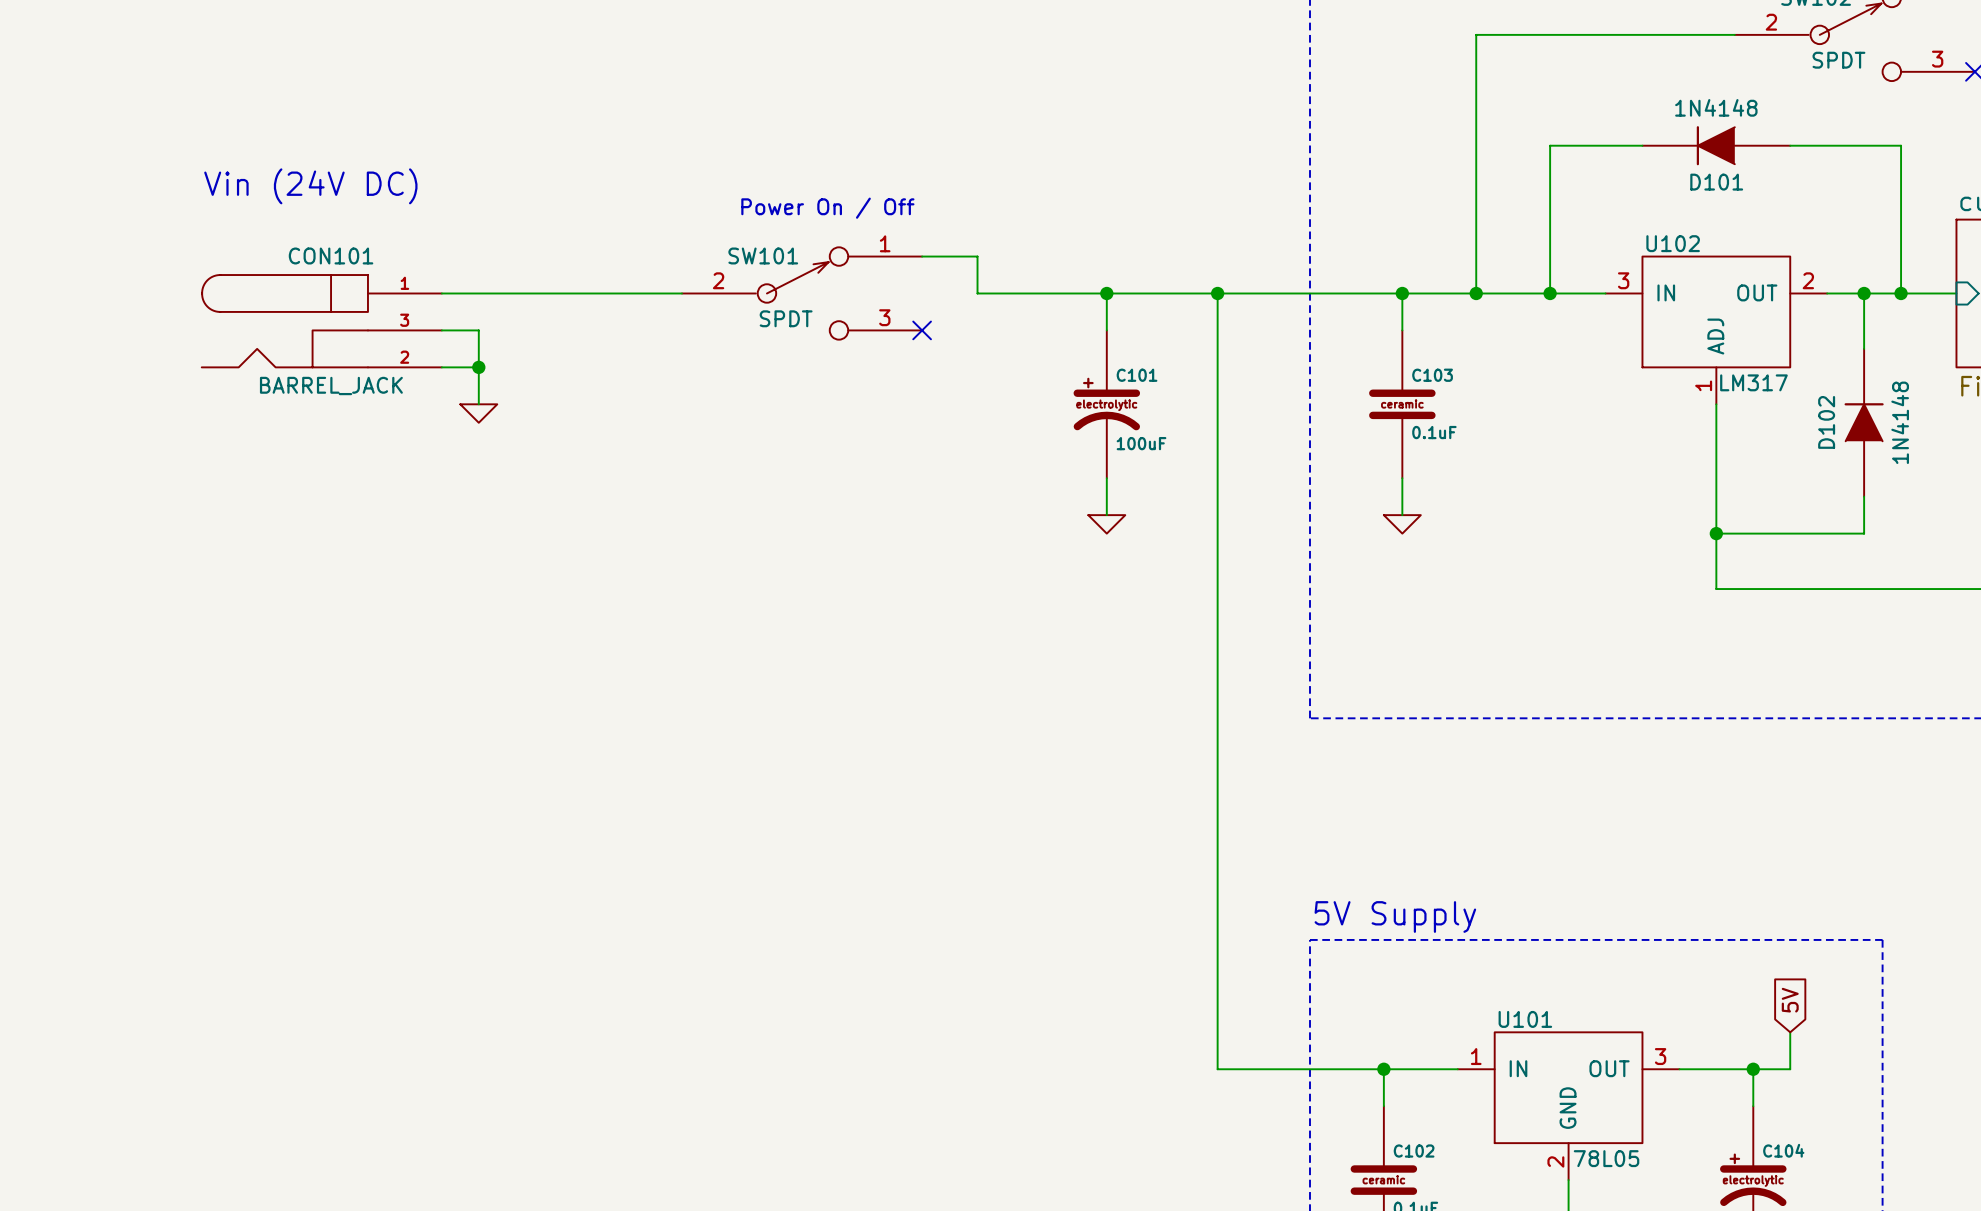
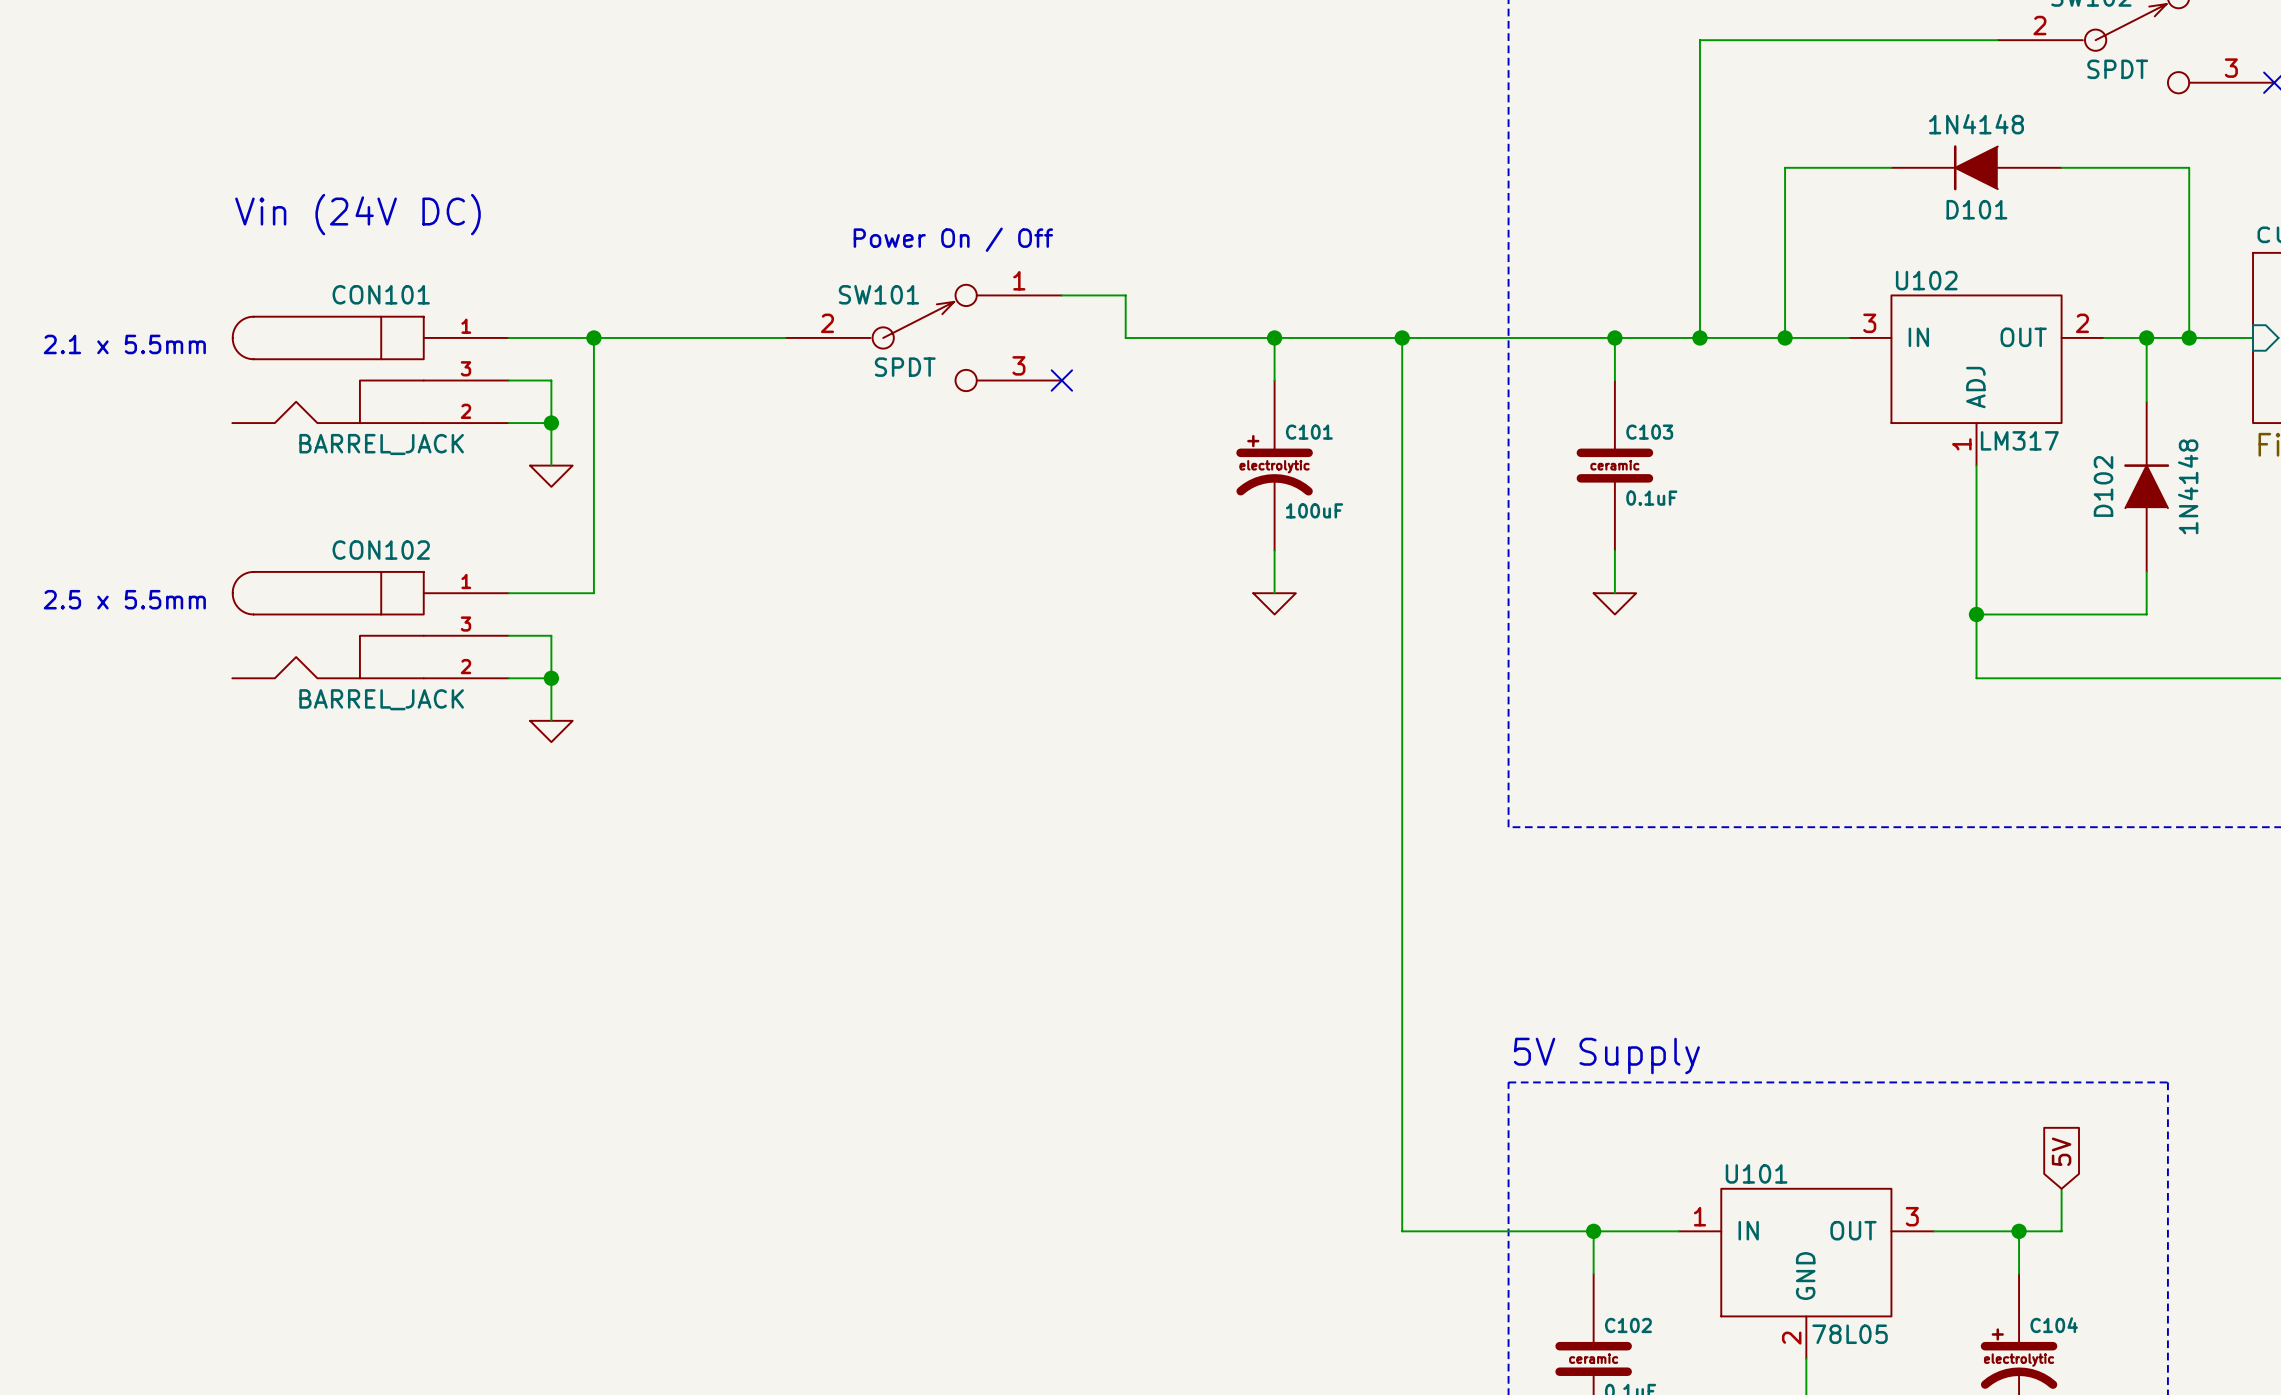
wire: none -> (593, 337) (593, 593) (508, 593)
junction: none -> (593, 337)
text: none -> 2.1 x 5.5mm (124, 344)
text: none -> 2.5 x 5.5mm (124, 599)
CON102: none -> BARREL_JACK (370, 625)
wire: none -> (508, 635) (551, 635) (551, 720)
wire: none -> (508, 678) (551, 678)
junction: none -> (551, 678)
power symbol: none -> (551, 731)

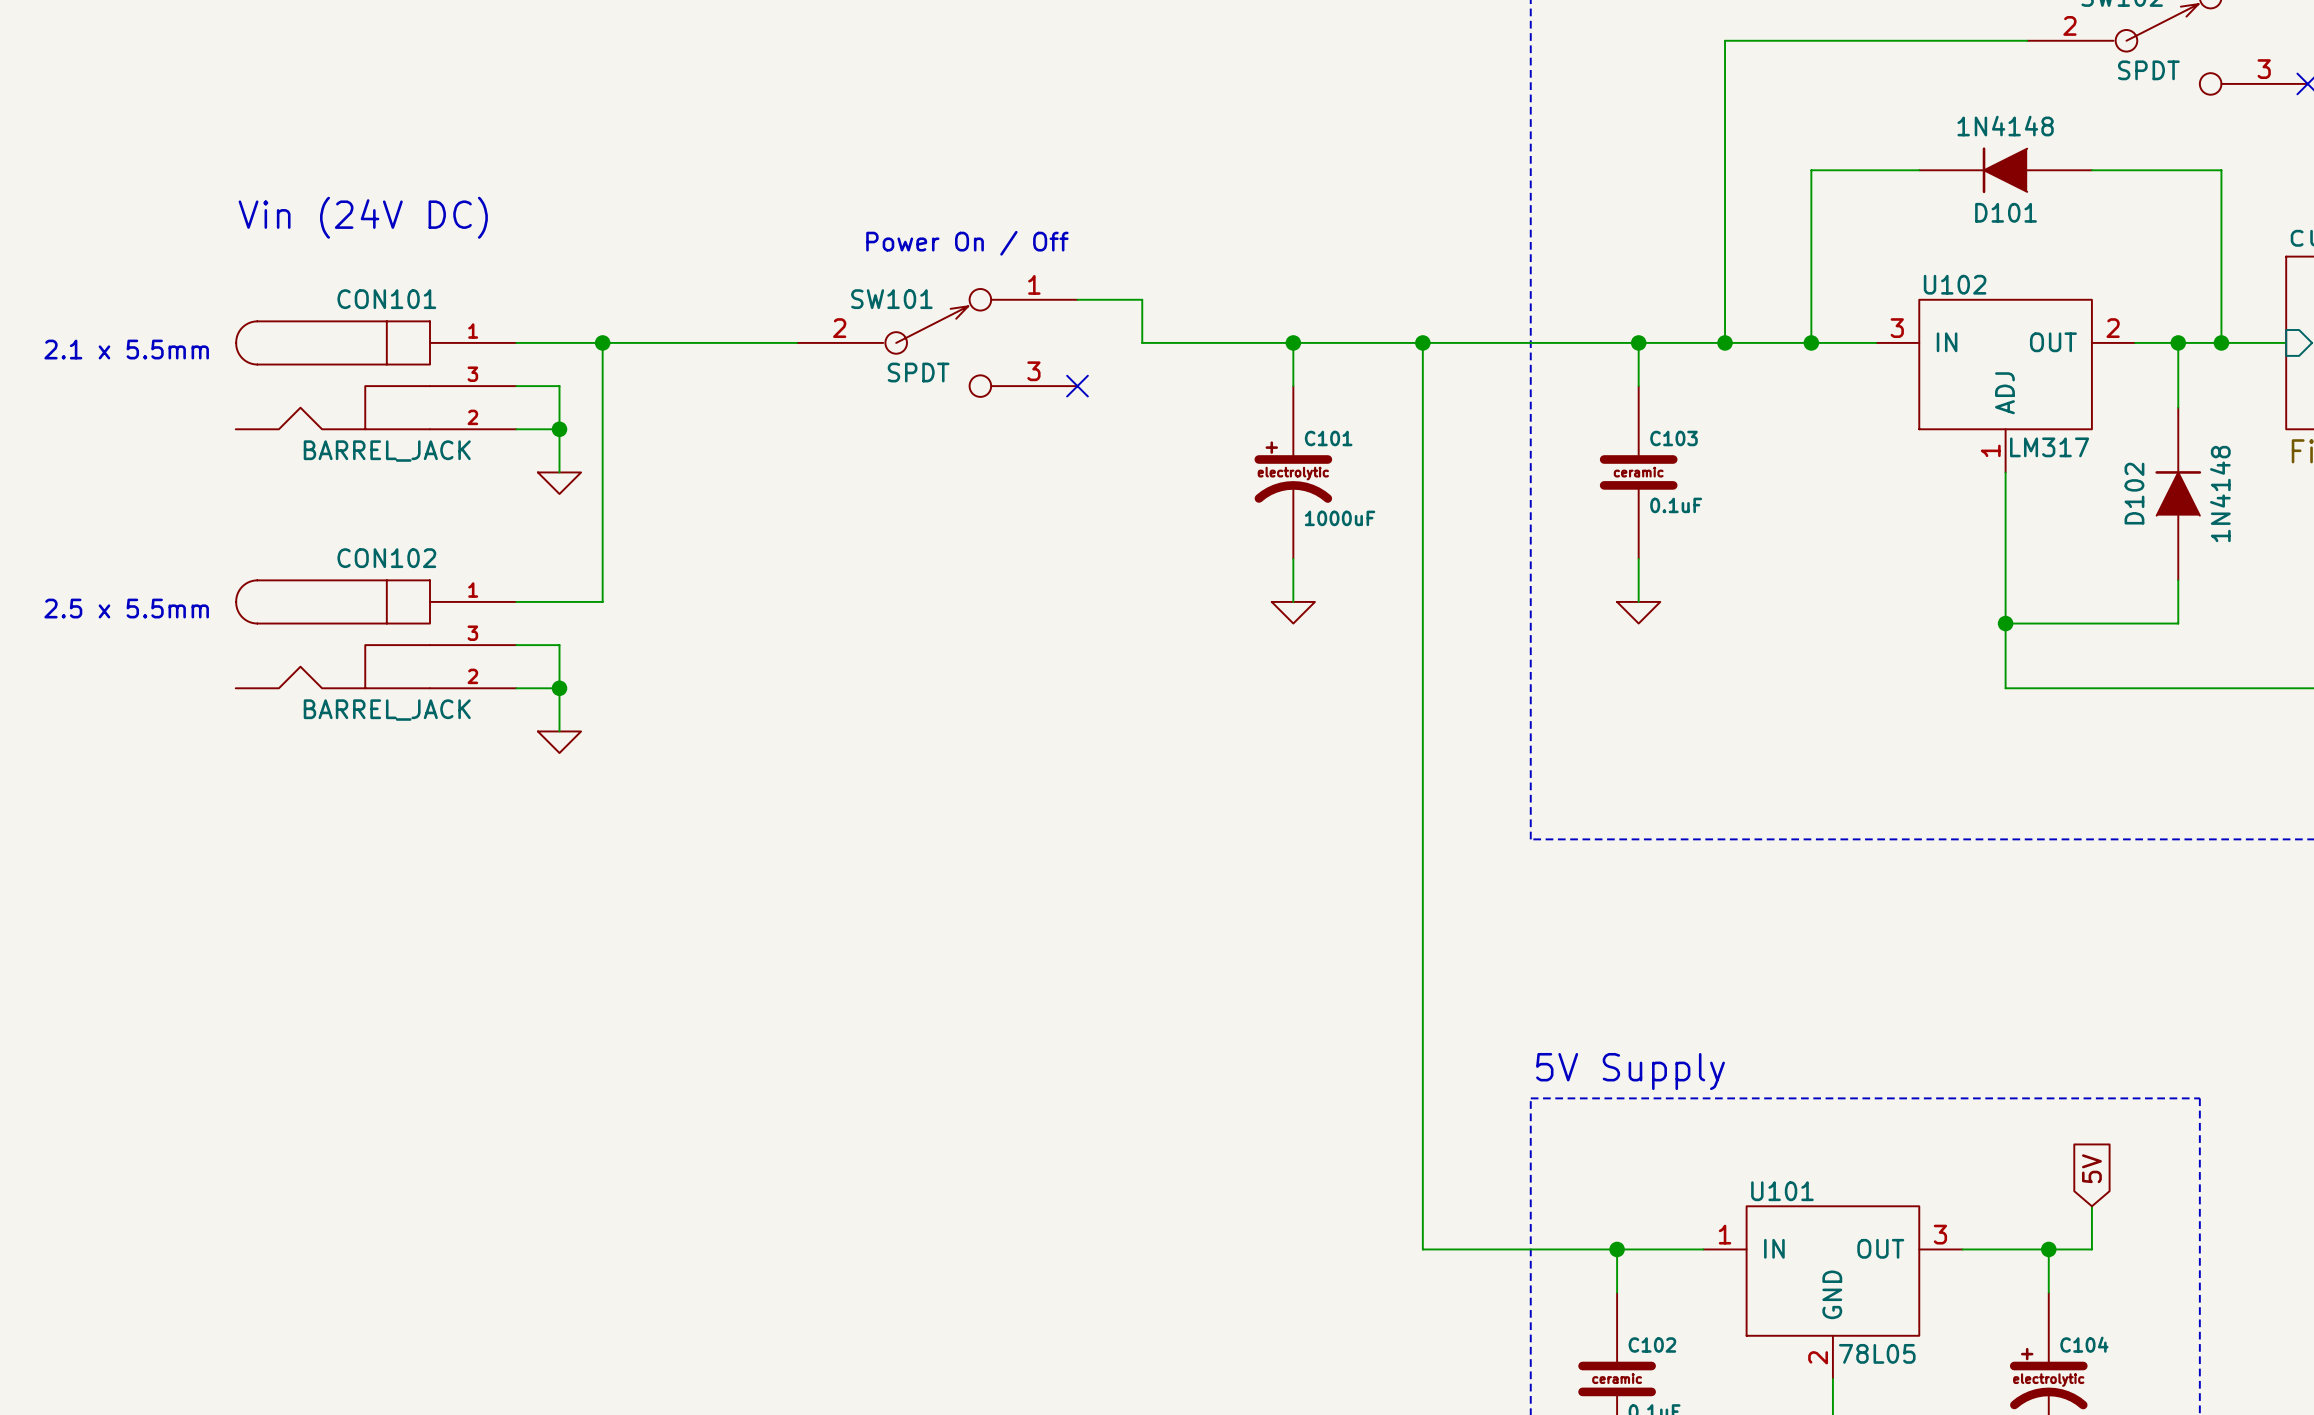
C101 value: 100uF (1314, 510) -> 1000uF (1340, 518)

